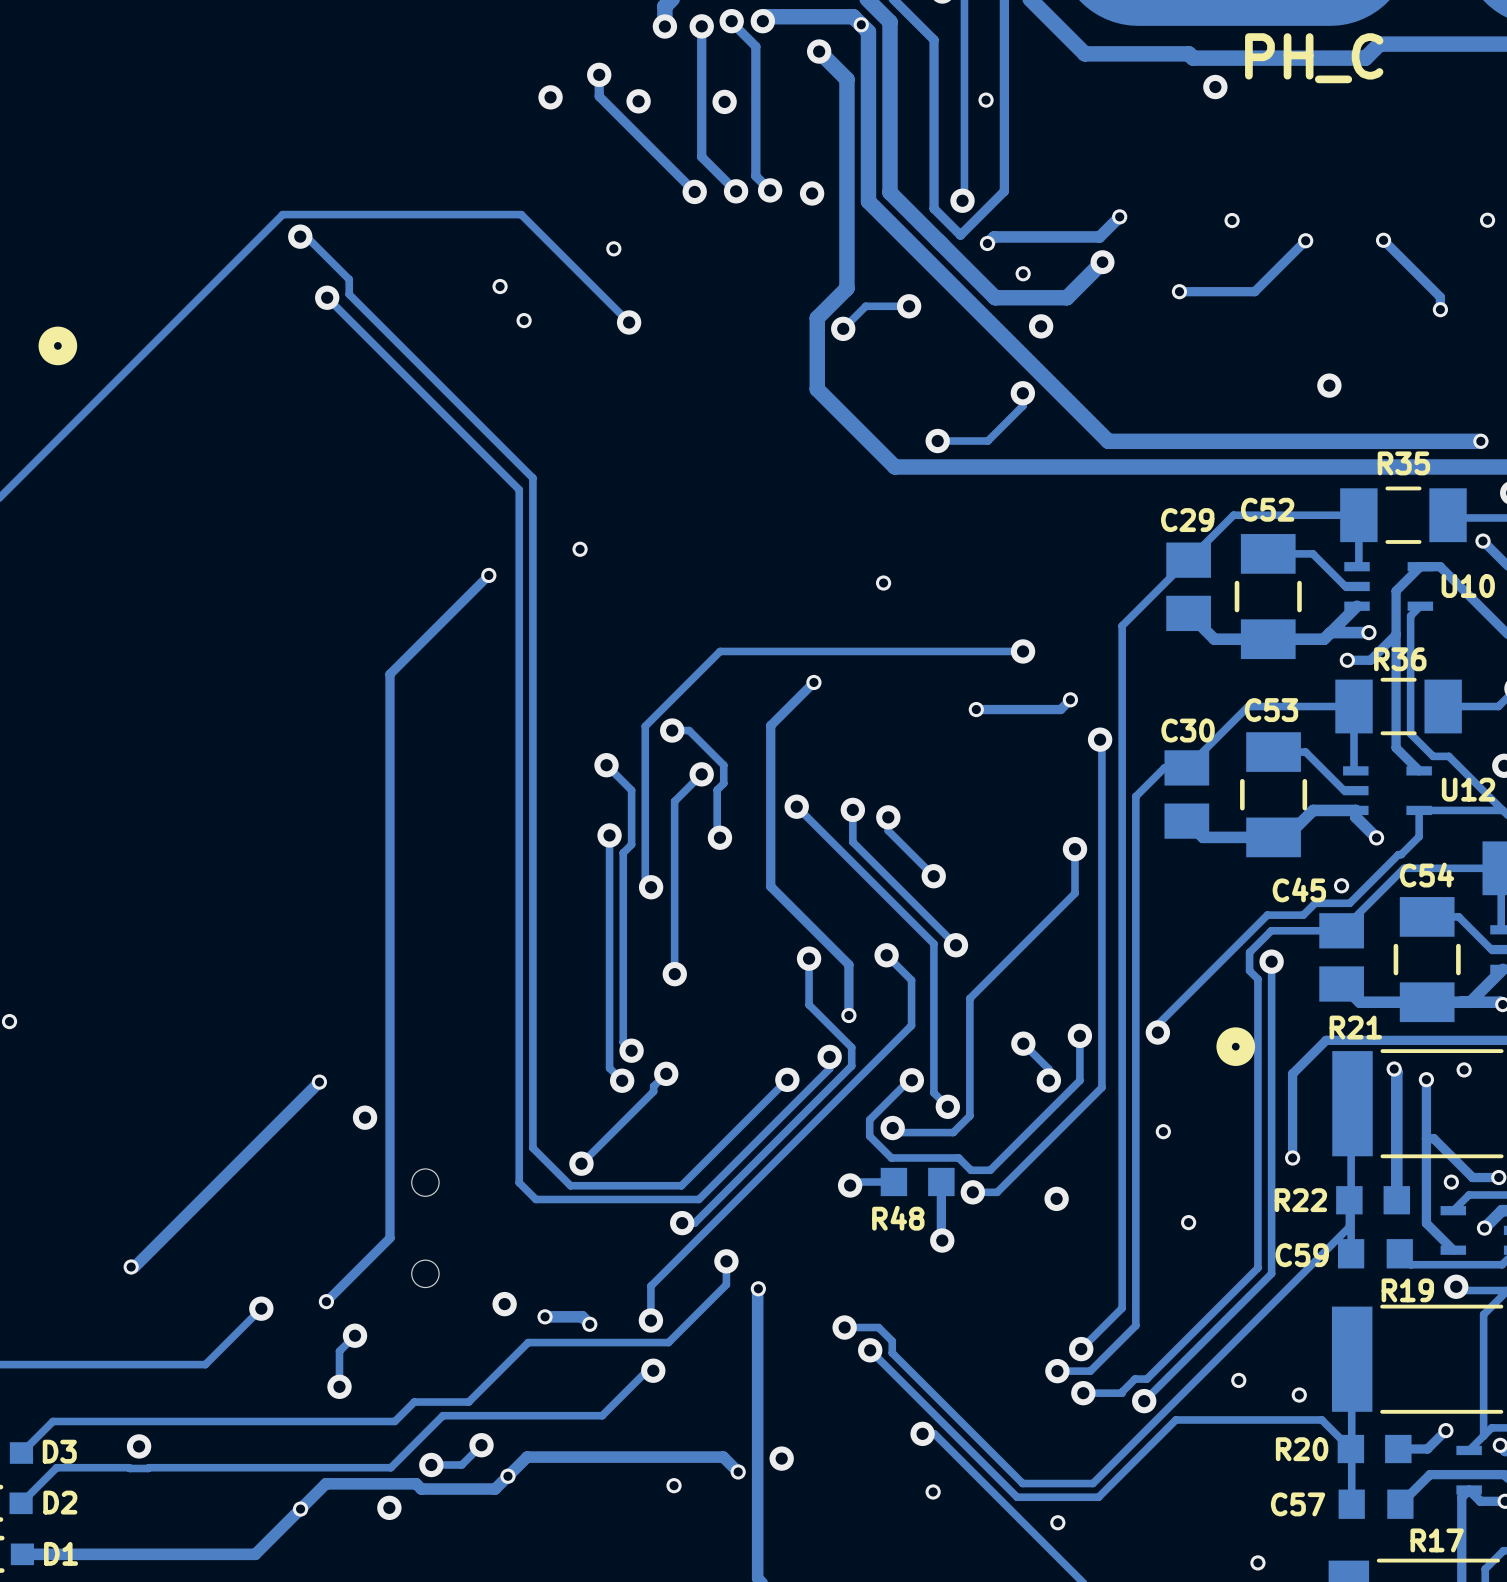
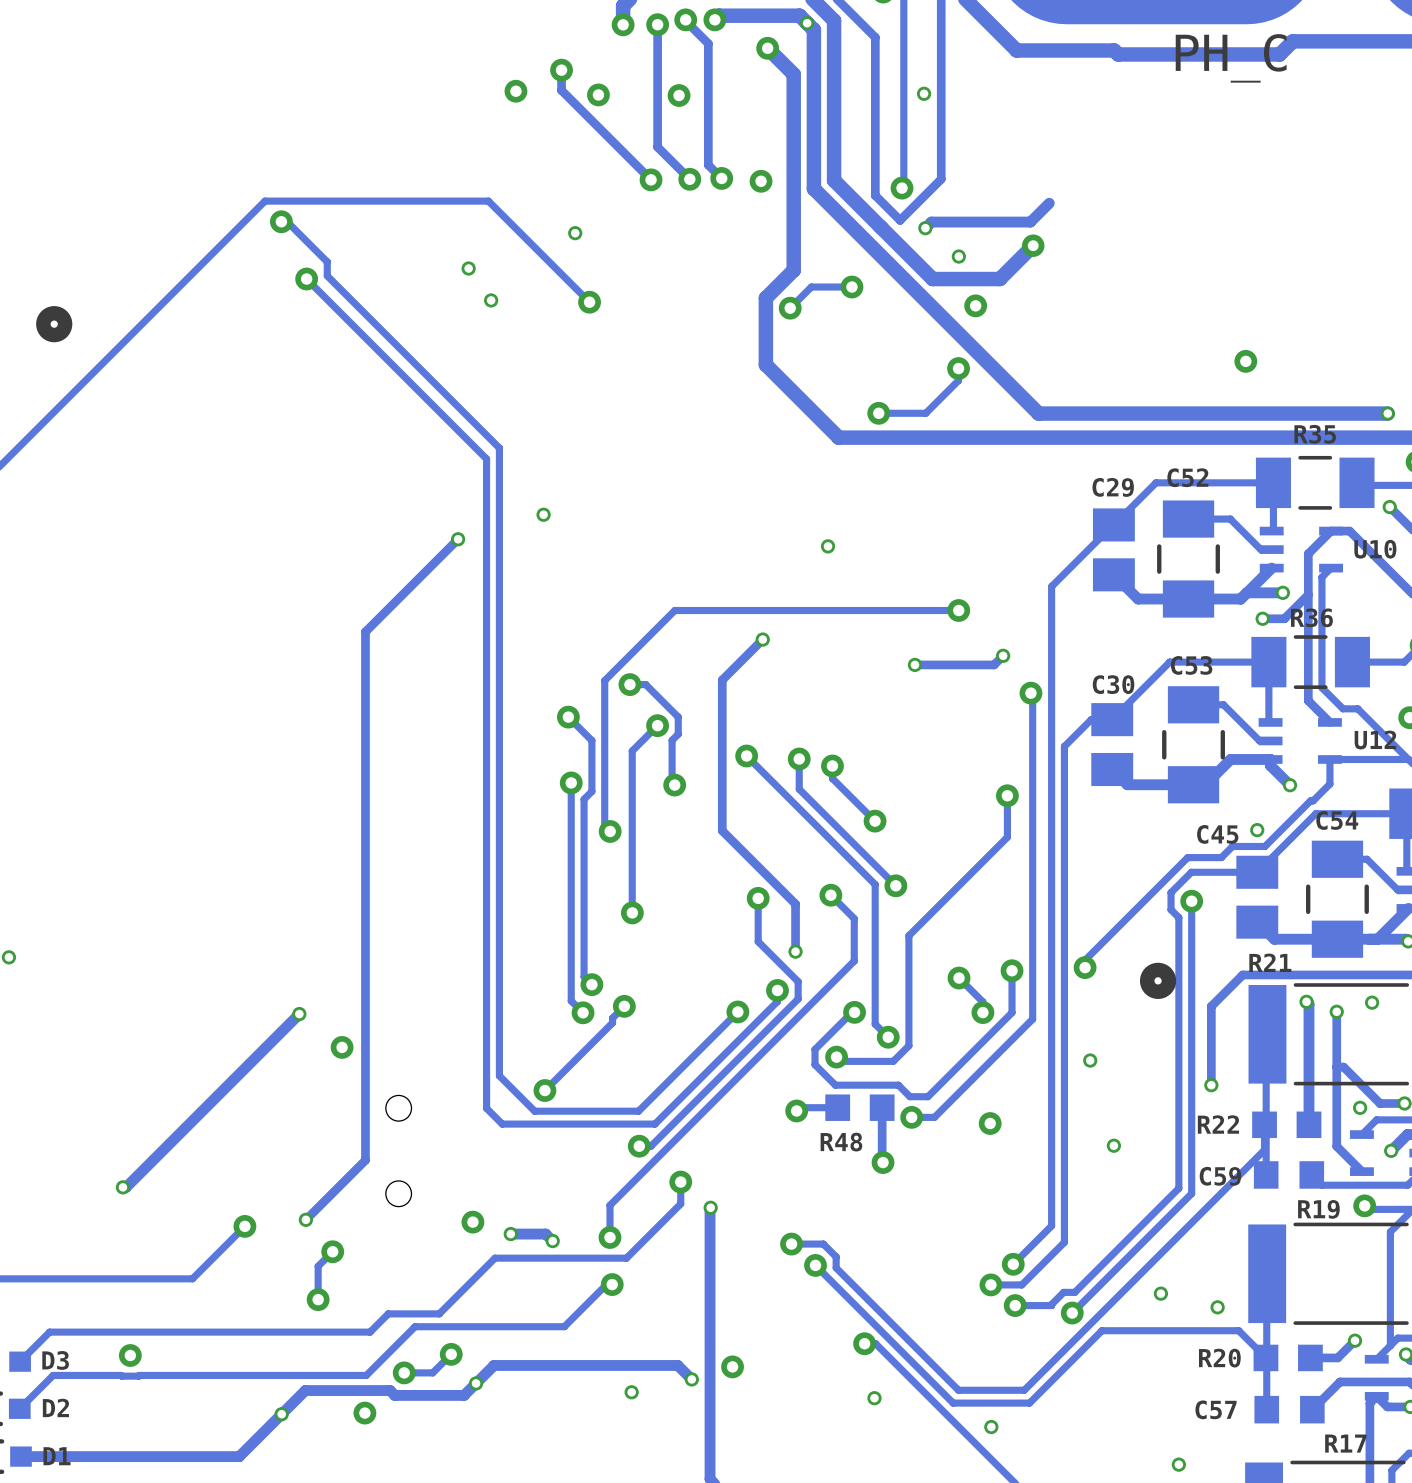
via: (1215, 87) -> none
via: (1119, 216) -> none
via: (1232, 220) -> none
via: (1487, 220) -> none
track: (1305, 240) (1254, 291) (1179, 291) -> none
via: (1305, 240) -> none
track: (1383, 240) (1440, 297) (1440, 309) -> none
via: (1383, 240) -> none
via: (1179, 291) -> none
via: (1440, 309) -> none

